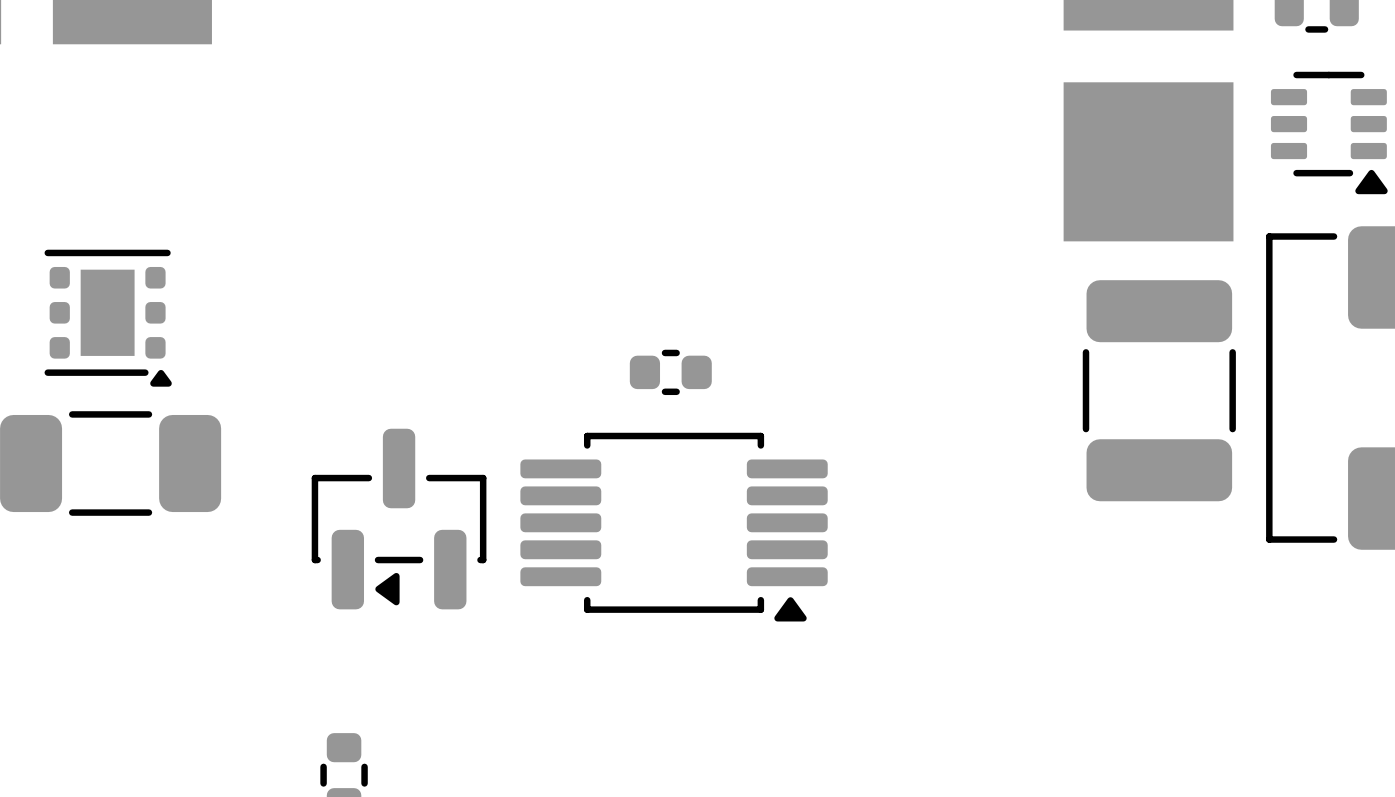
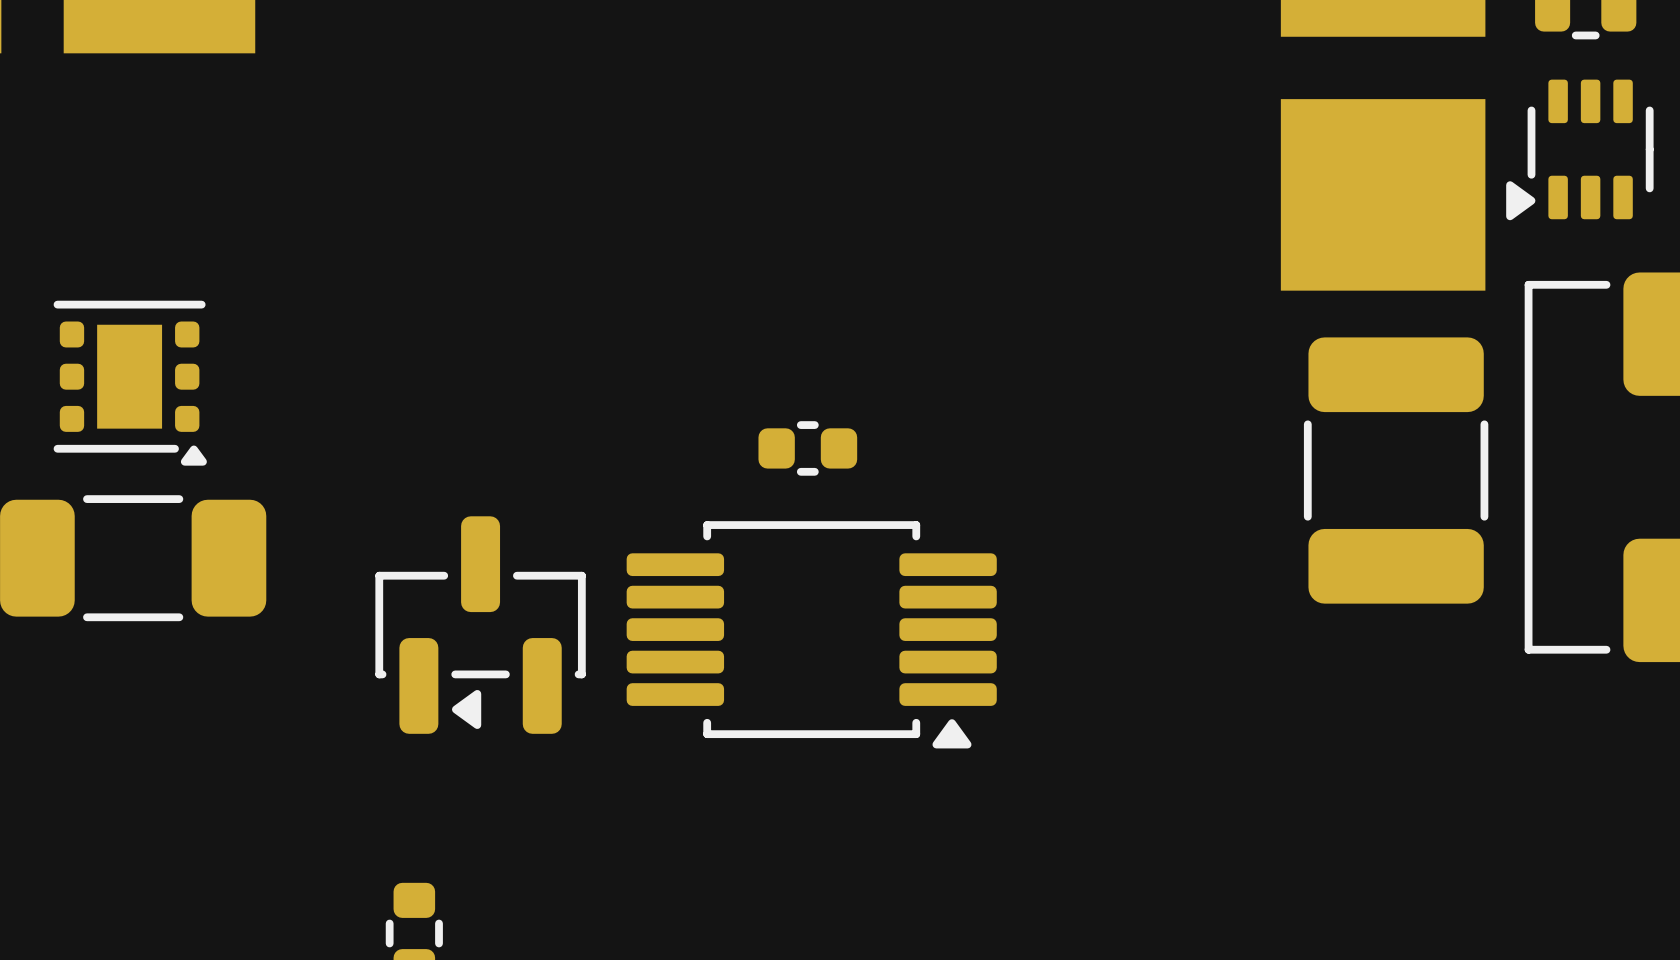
part rotation: 0° (1329, 132) -> 90° clockwise (1579, 149)

